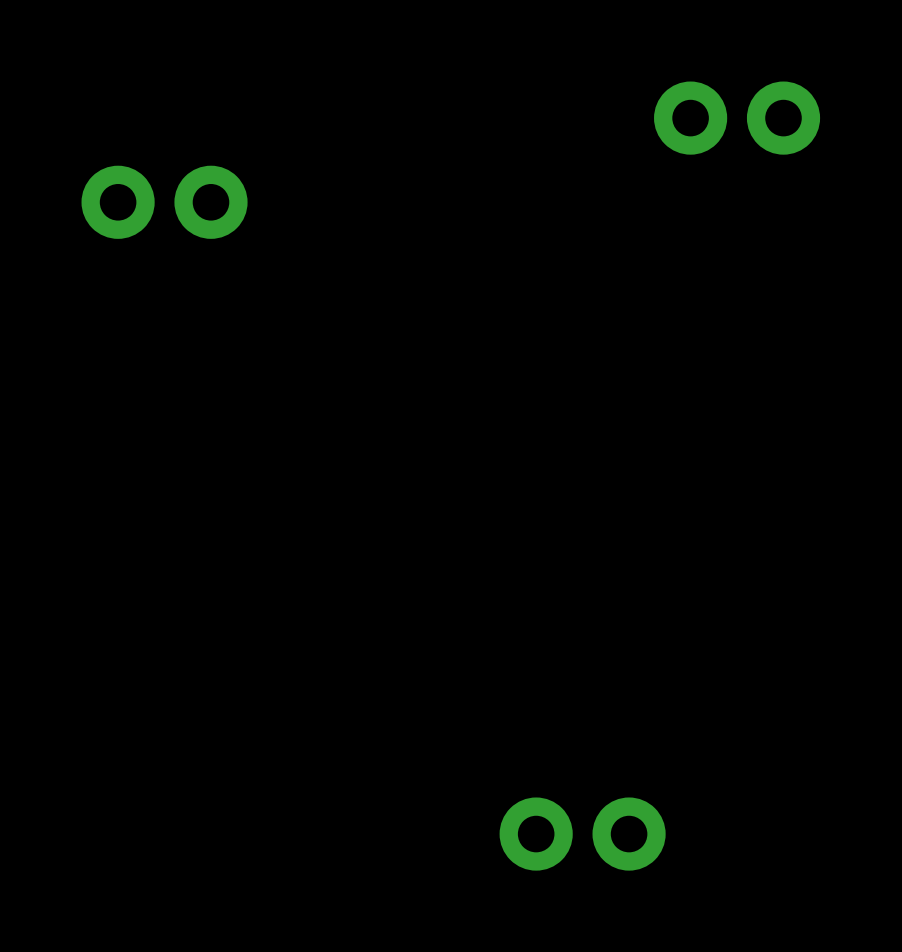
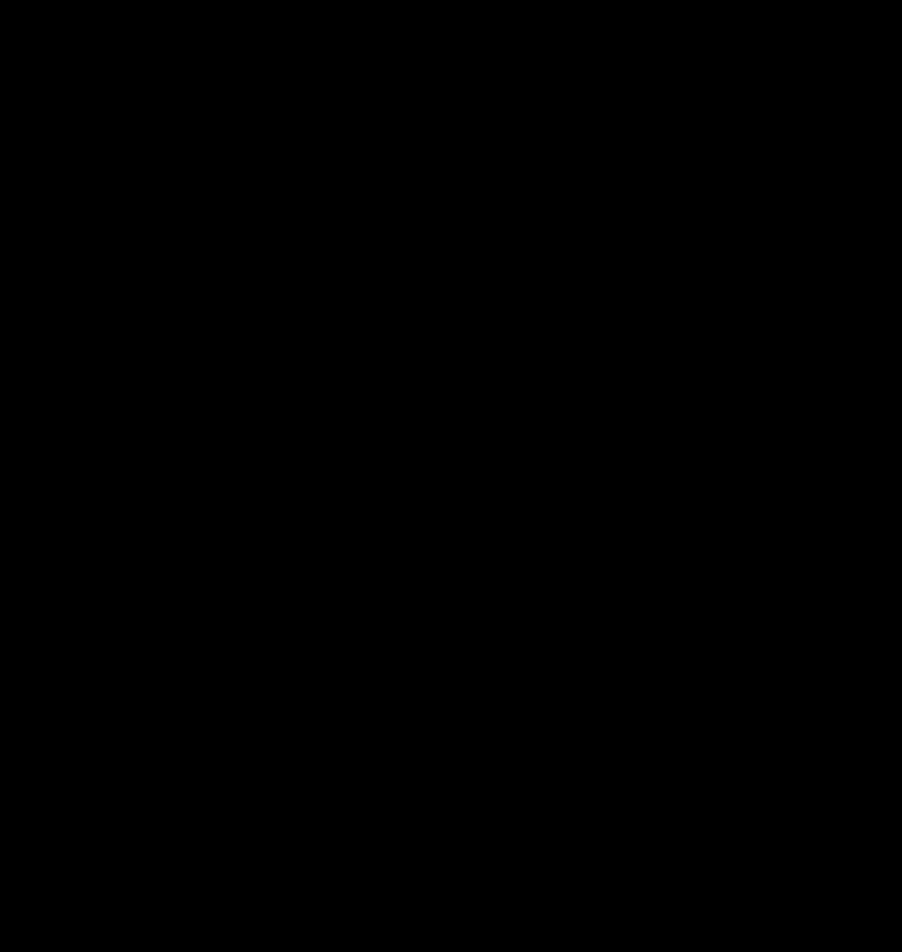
part: (737, 118) -> none
part: (164, 202) -> none
part: (582, 834) -> none

